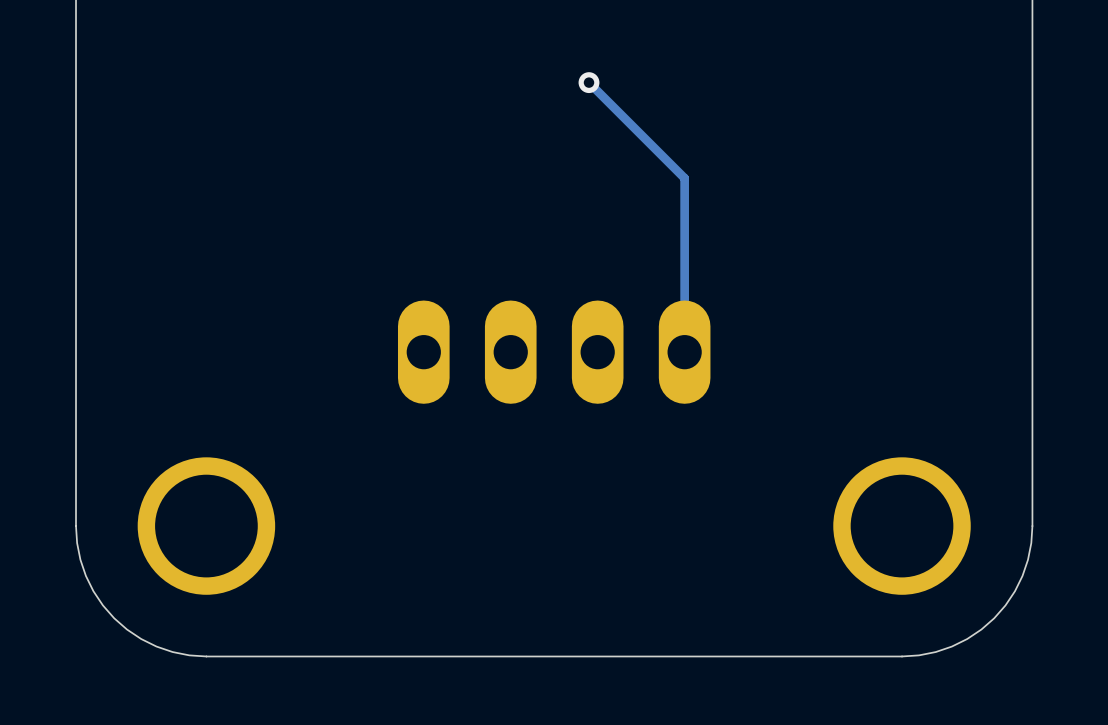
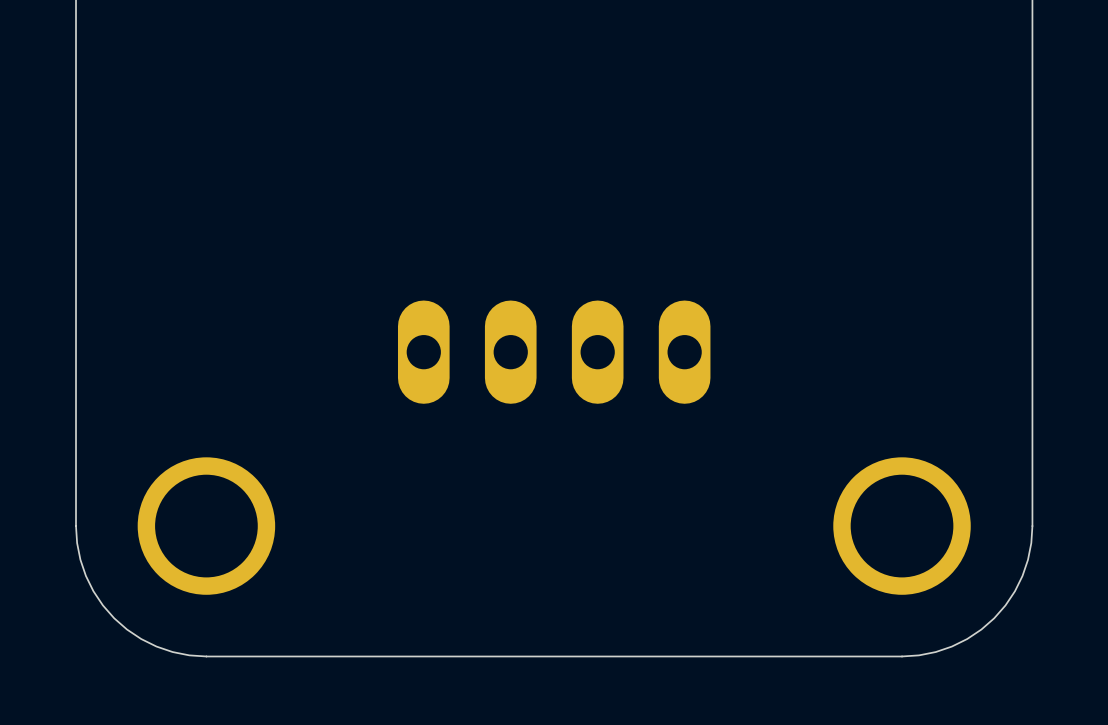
track: (589, 82) (684, 178) (684, 352) -> none
via: (589, 82) -> none

